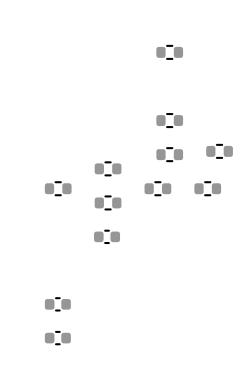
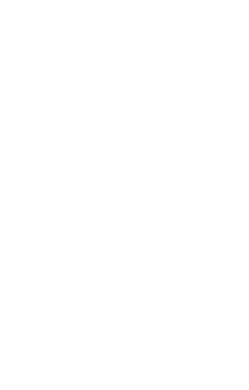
part: (169, 52) -> none
part: (169, 120) -> none
part: (219, 151) -> none
part: (169, 154) -> none
part: (108, 168) -> none
part: (58, 188) -> none
part: (157, 188) -> none
part: (207, 188) -> none
part: (108, 202) -> none
part: (107, 236) -> none
part: (57, 304) -> none
part: (57, 338) -> none

